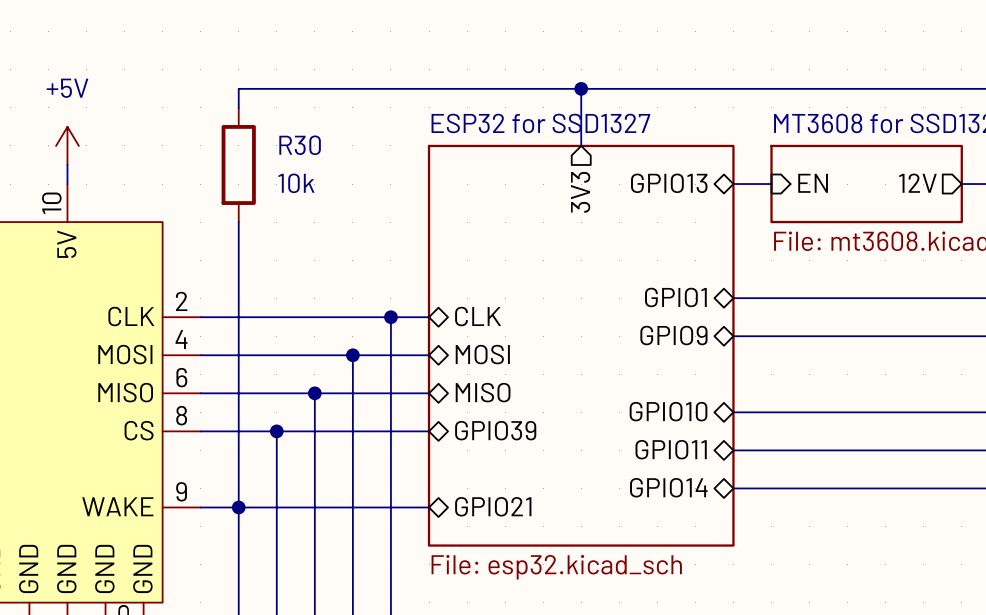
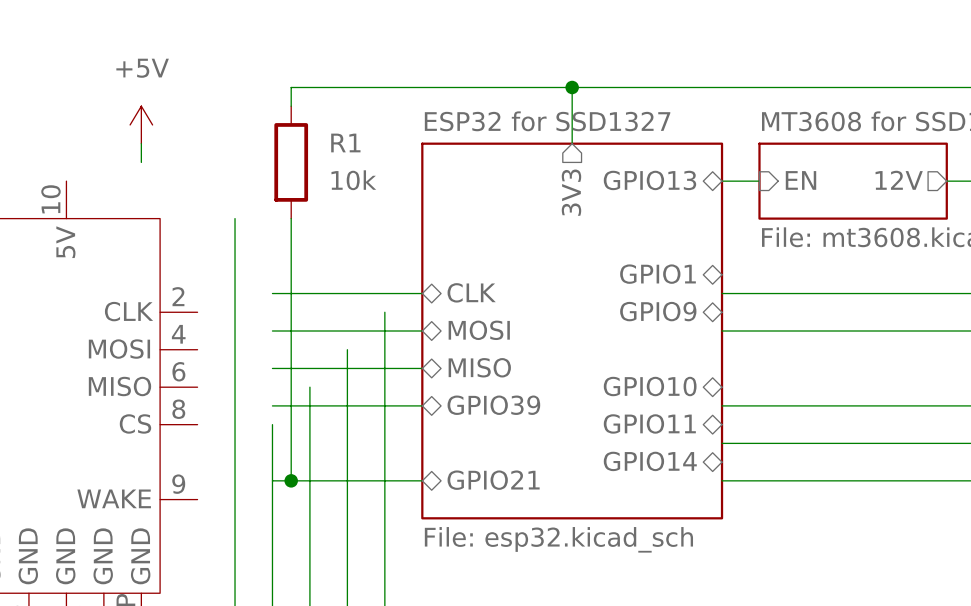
wire: (295, 88) (238, 88) (238, 107) -> (291, 87) (291, 106)
sheet ESP32 for SSD1327 shape: [427, 144, 735, 547] -> [421, 142, 724, 520]
power symbol position: +5V (67, 145) -> +5V (141, 124)
wire: (67, 164) (67, 184) -> (141, 143) (141, 162)
R30: 10k (238, 164) -> none
R1: none -> 10k (291, 162)
wire: none -> (291, 218) (291, 480)
sheet pin position: GPIO1 (675, 297) -> GPIO1 (657, 274)
wire: none -> (272, 293) (422, 293)
sheet pin position: CLK (478, 316) -> CLK (471, 292)
wire: (200, 317) (429, 317) -> none
junction: (390, 317) -> none
sheet pin position: GPIO9 (673, 335) -> GPIO9 (658, 311)
wire: none -> (272, 331) (422, 331)
sheet pin position: MOSI (482, 354) -> MOSI (479, 330)
wire: (200, 355) (429, 355) -> none
junction: (352, 355) -> none
wire: none -> (272, 368) (422, 368)
sheet pin position: MISO (483, 392) -> MISO (479, 367)
wire: (200, 393) (429, 393) -> none
junction: (314, 393) -> none
sheet pin position: GPIO10 (668, 411) -> GPIO10 (650, 386)
wire: none -> (272, 405) (422, 405)
sheet pin position: GPIO39 (495, 430) -> GPIO39 (493, 405)
wire: (200, 431) (429, 431) -> none
junction: (276, 431) -> none
sheet pin position: GPIO11 (671, 449) -> GPIO11 (649, 423)
sheet pin position: GPIO14 (668, 487) -> GPIO14 (650, 461)
wire: none -> (272, 480) (422, 480)
junction: none -> (291, 480)
sheet pin position: GPIO21 (493, 506) -> GPIO21 (493, 480)
wire: (200, 507) (429, 507) -> none
junction: (238, 507) -> none

